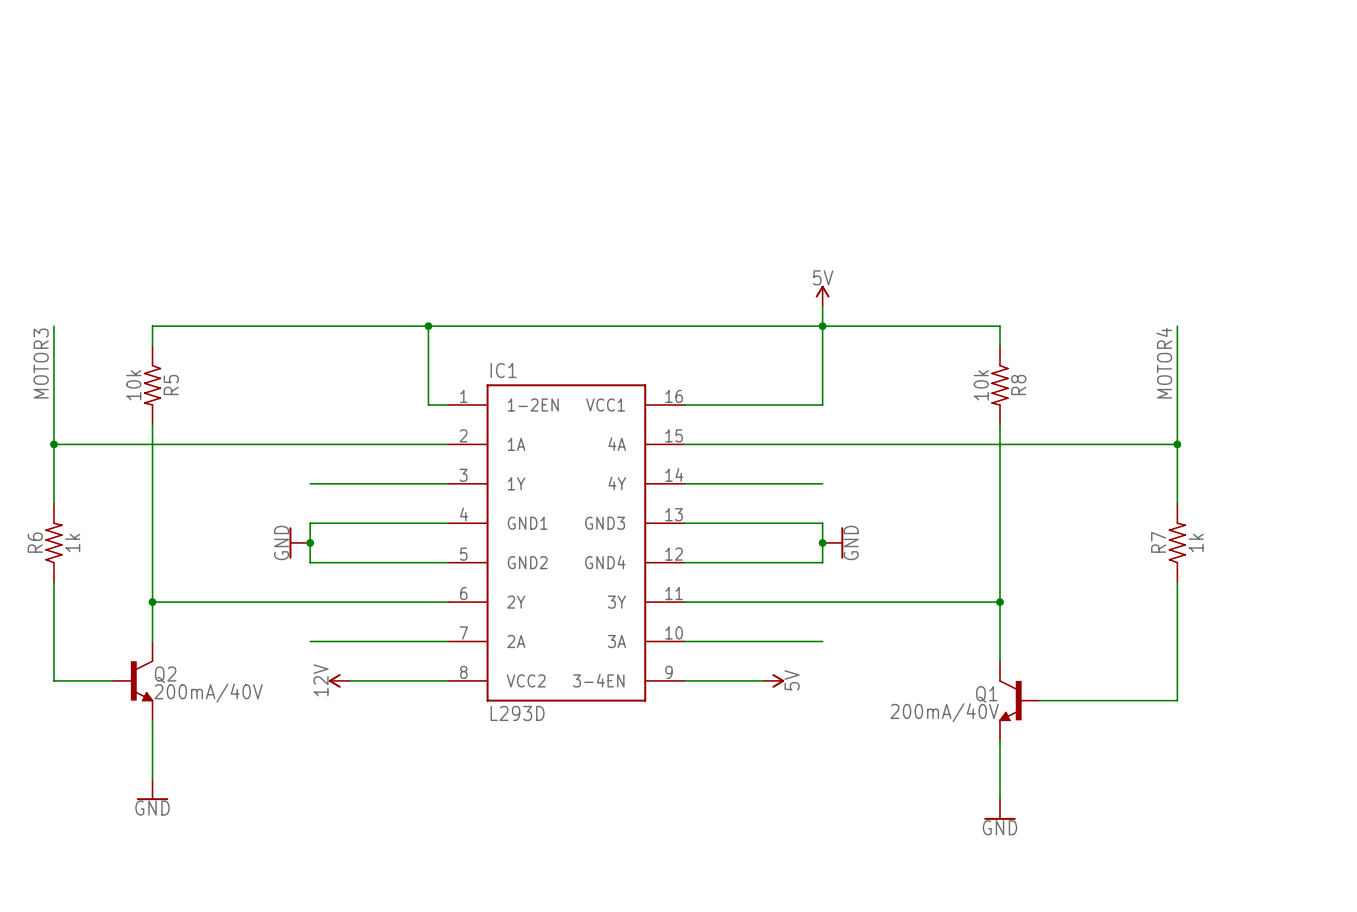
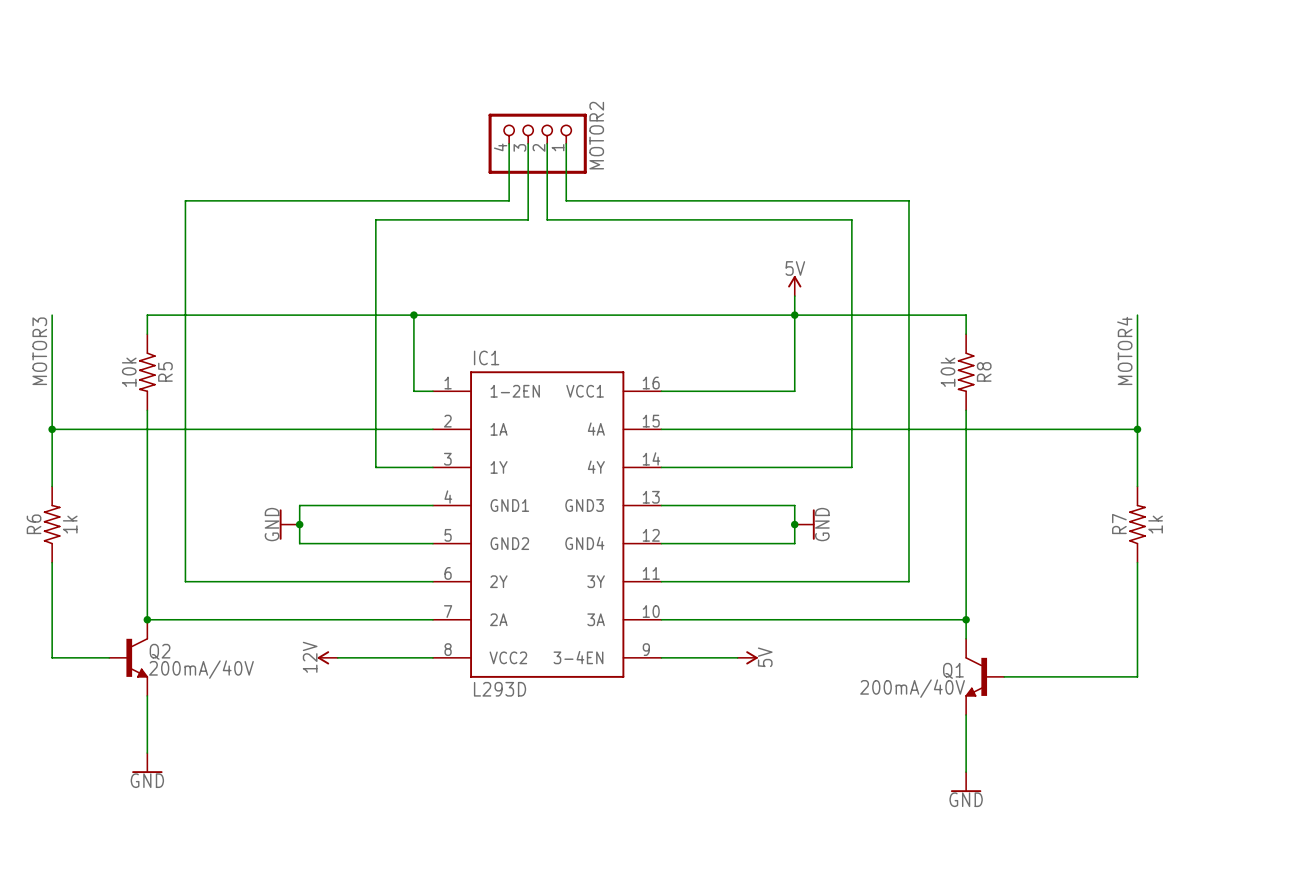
MOTOR2: none -> (537, 143)
wire: none -> (547, 143) (547, 219) (851, 219) (851, 467) (794, 467)
wire: (310, 483) (389, 483) -> (528, 143) (528, 219) (375, 219) (375, 467)
wire: (152, 602) (191, 602) -> (509, 143) (509, 200) (185, 200) (185, 581)
junction position: (152, 602) -> (147, 619)
wire: (940, 602) (999, 602) -> (908, 581) (908, 200) (566, 200) (566, 143)
junction position: (999, 602) -> (966, 619)
wire: none -> (147, 619) (299, 619)
wire: none -> (794, 619) (966, 619)

